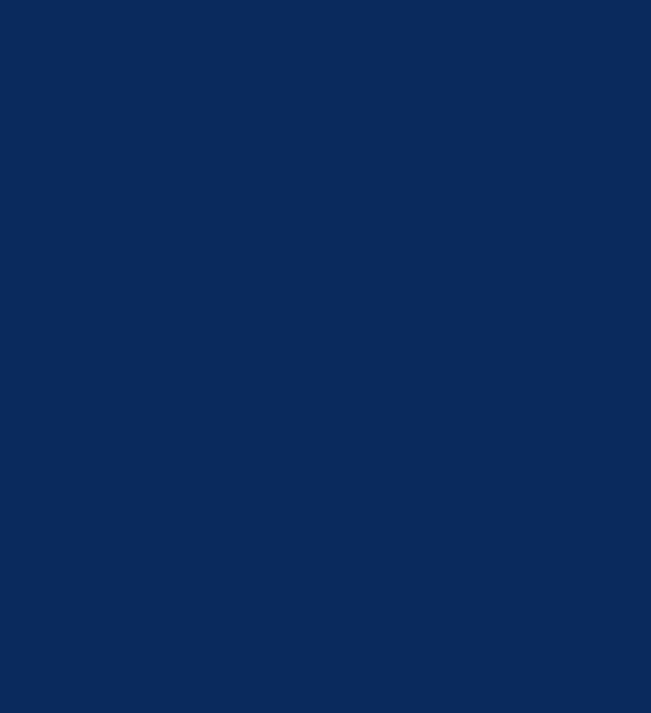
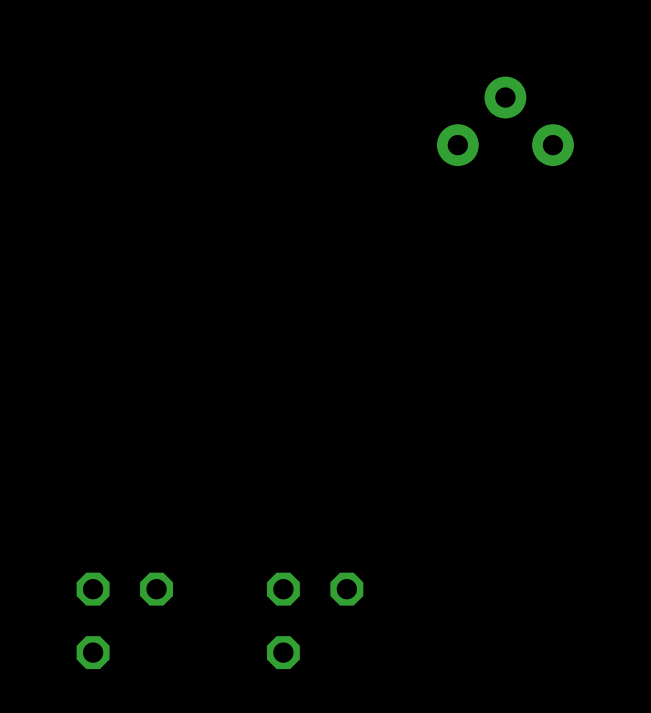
part: none -> (505, 121)
part: none -> (124, 620)
part: none -> (315, 620)

